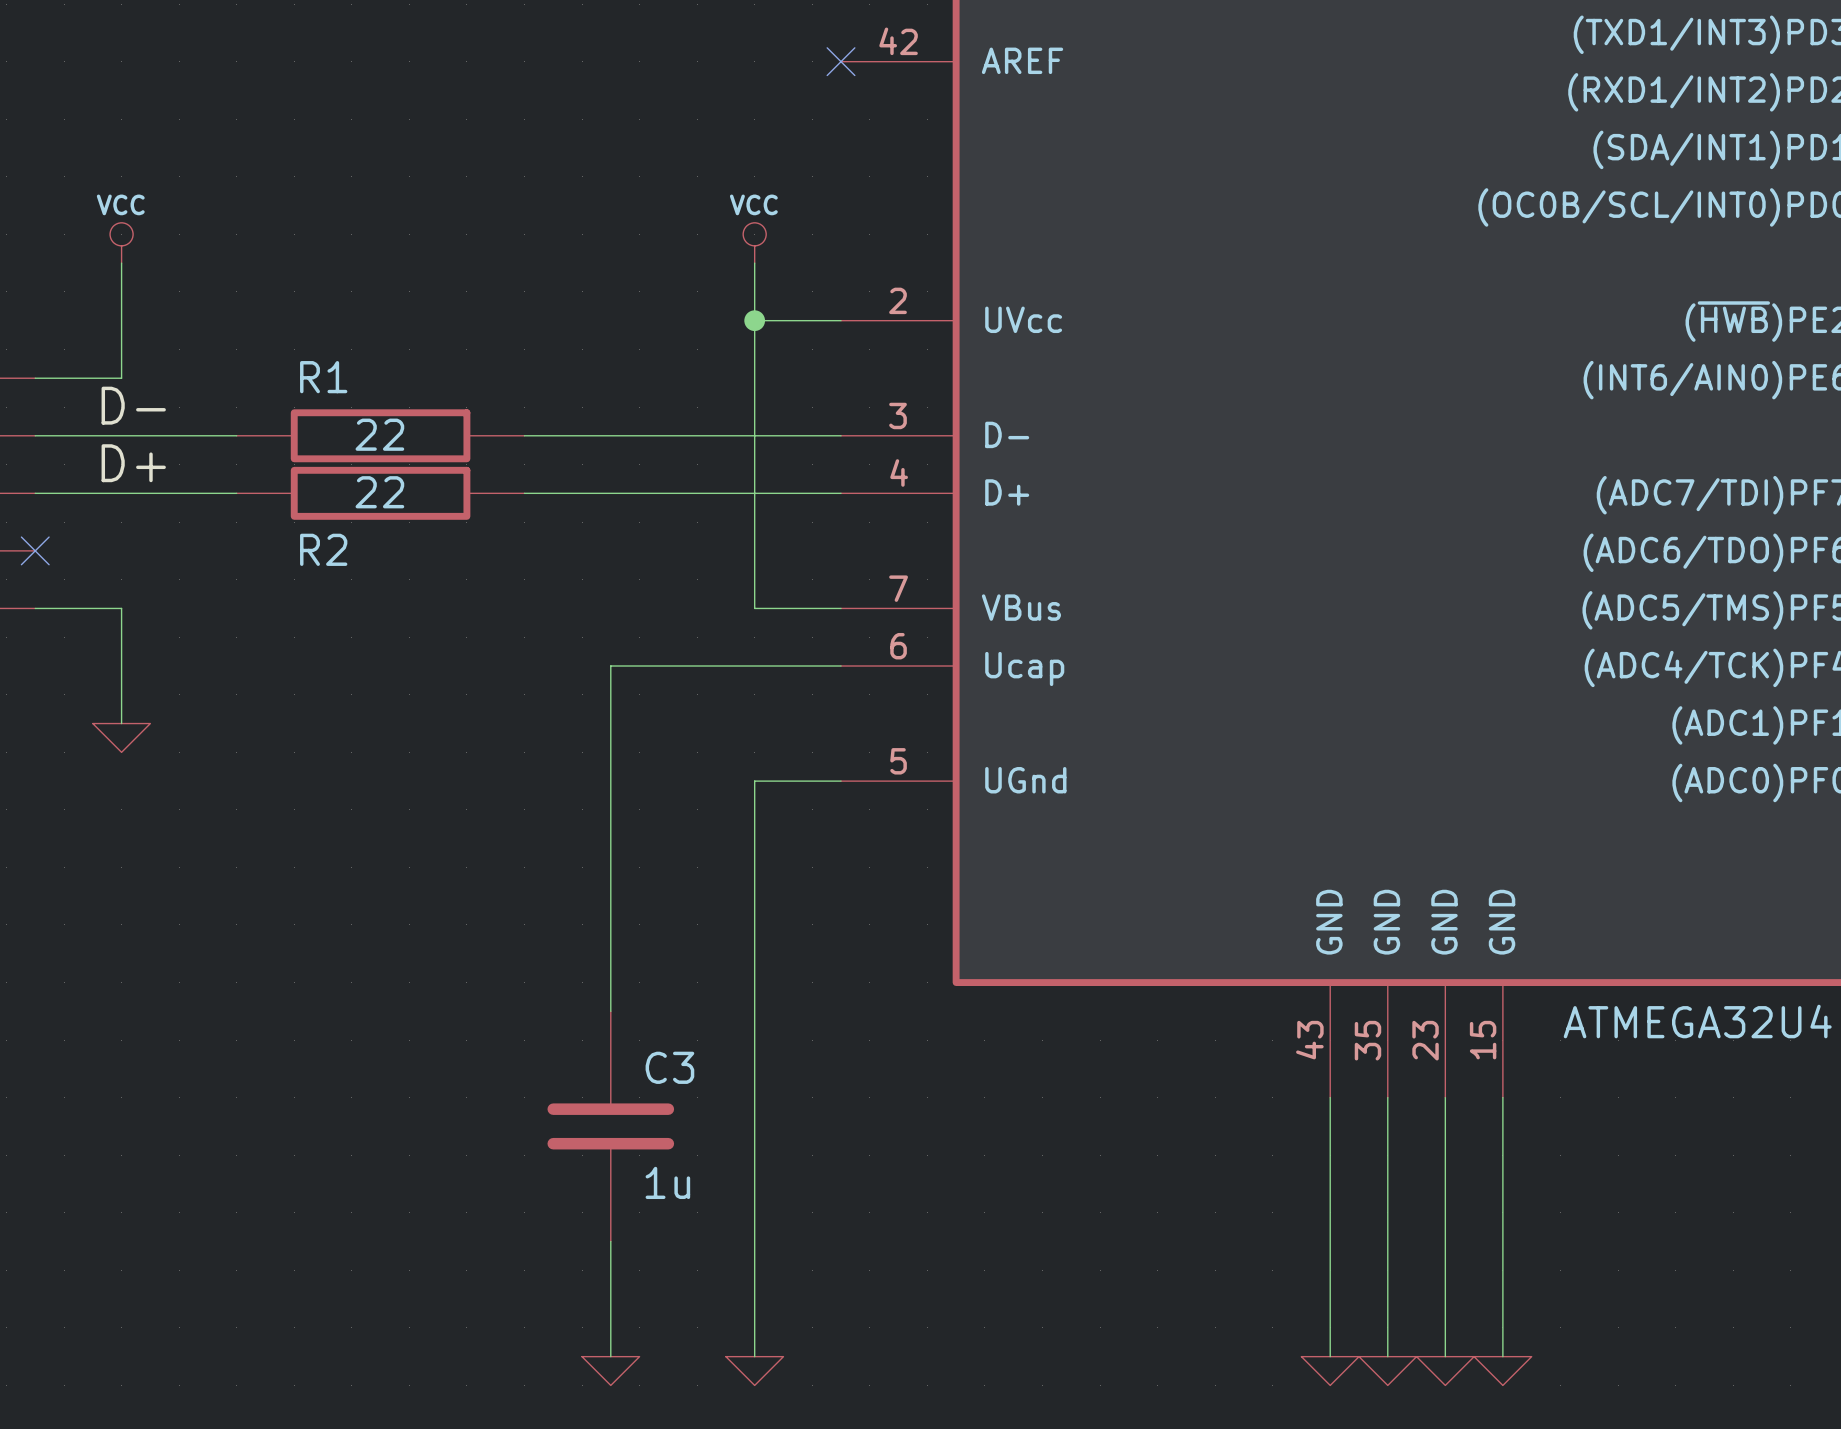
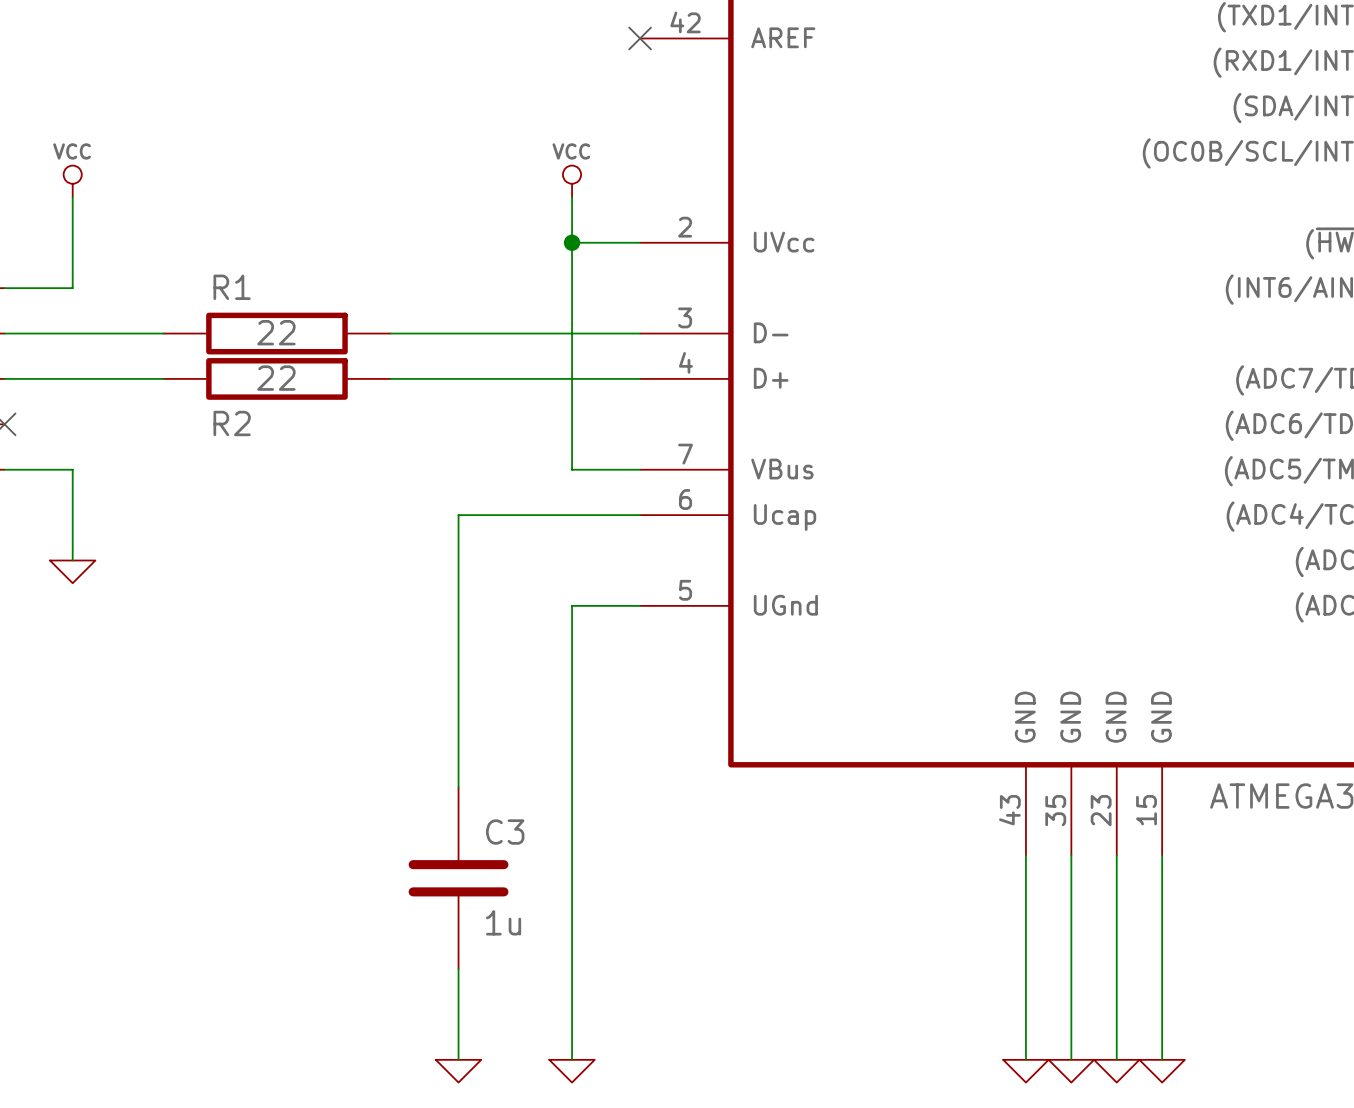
label: D- (133, 405) -> none
label: D+ (133, 463) -> none

